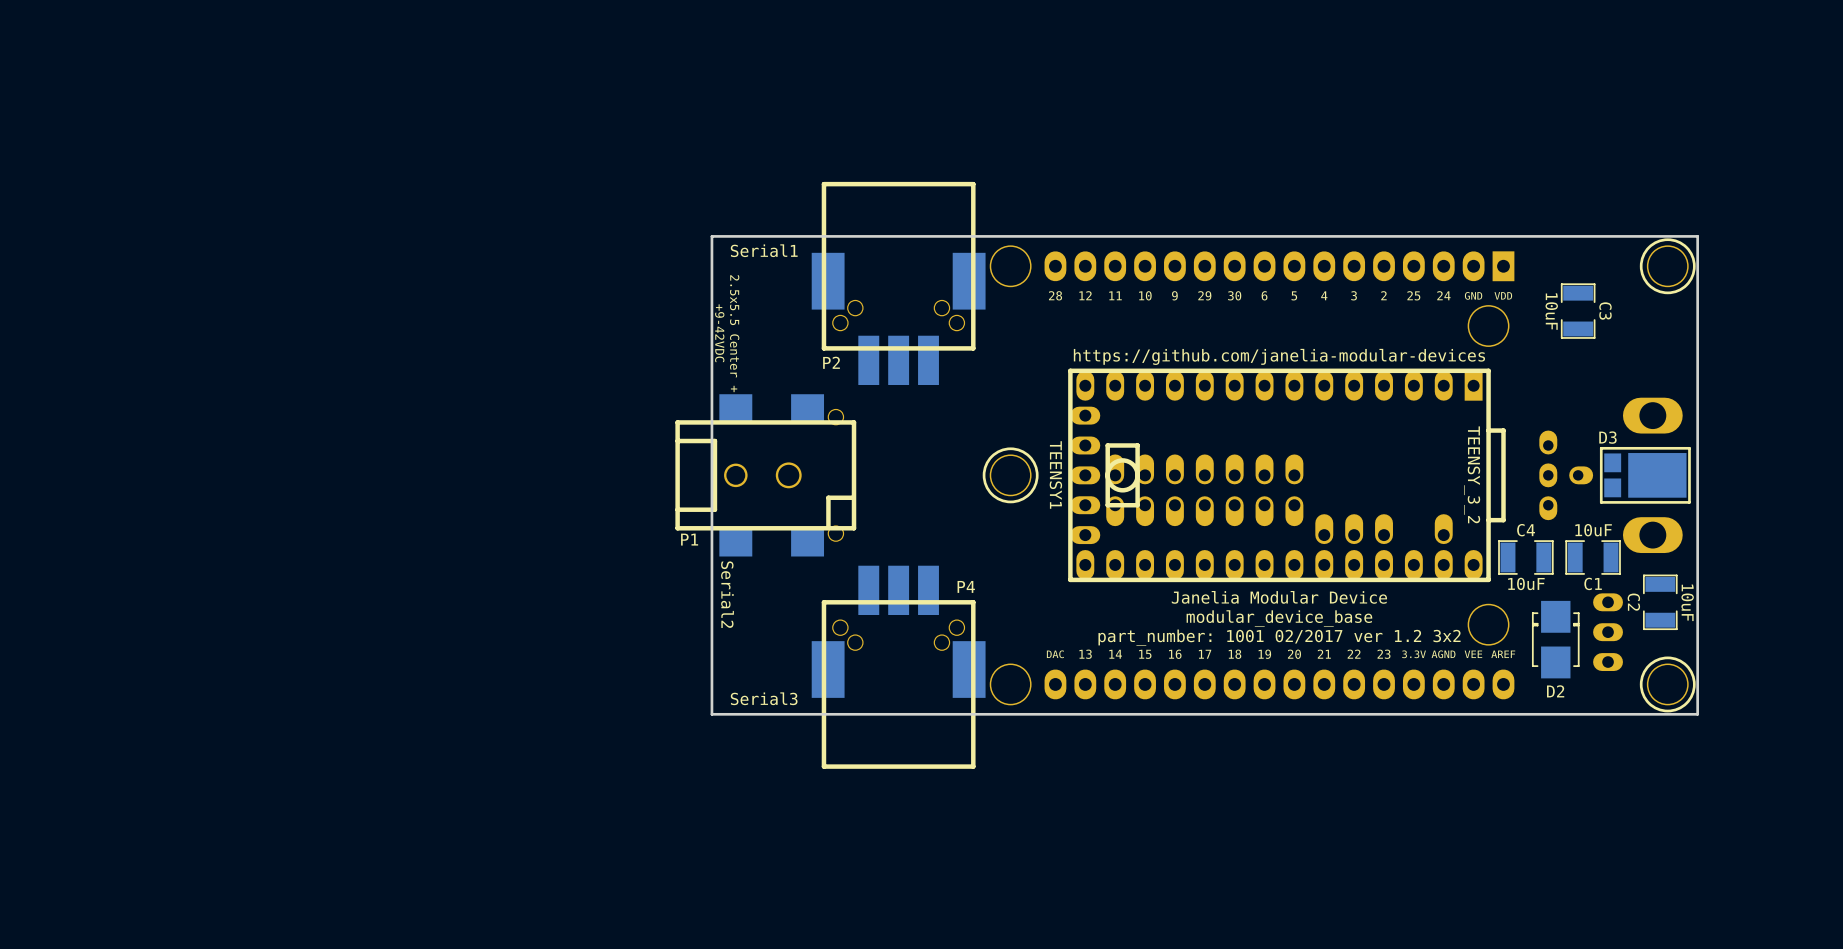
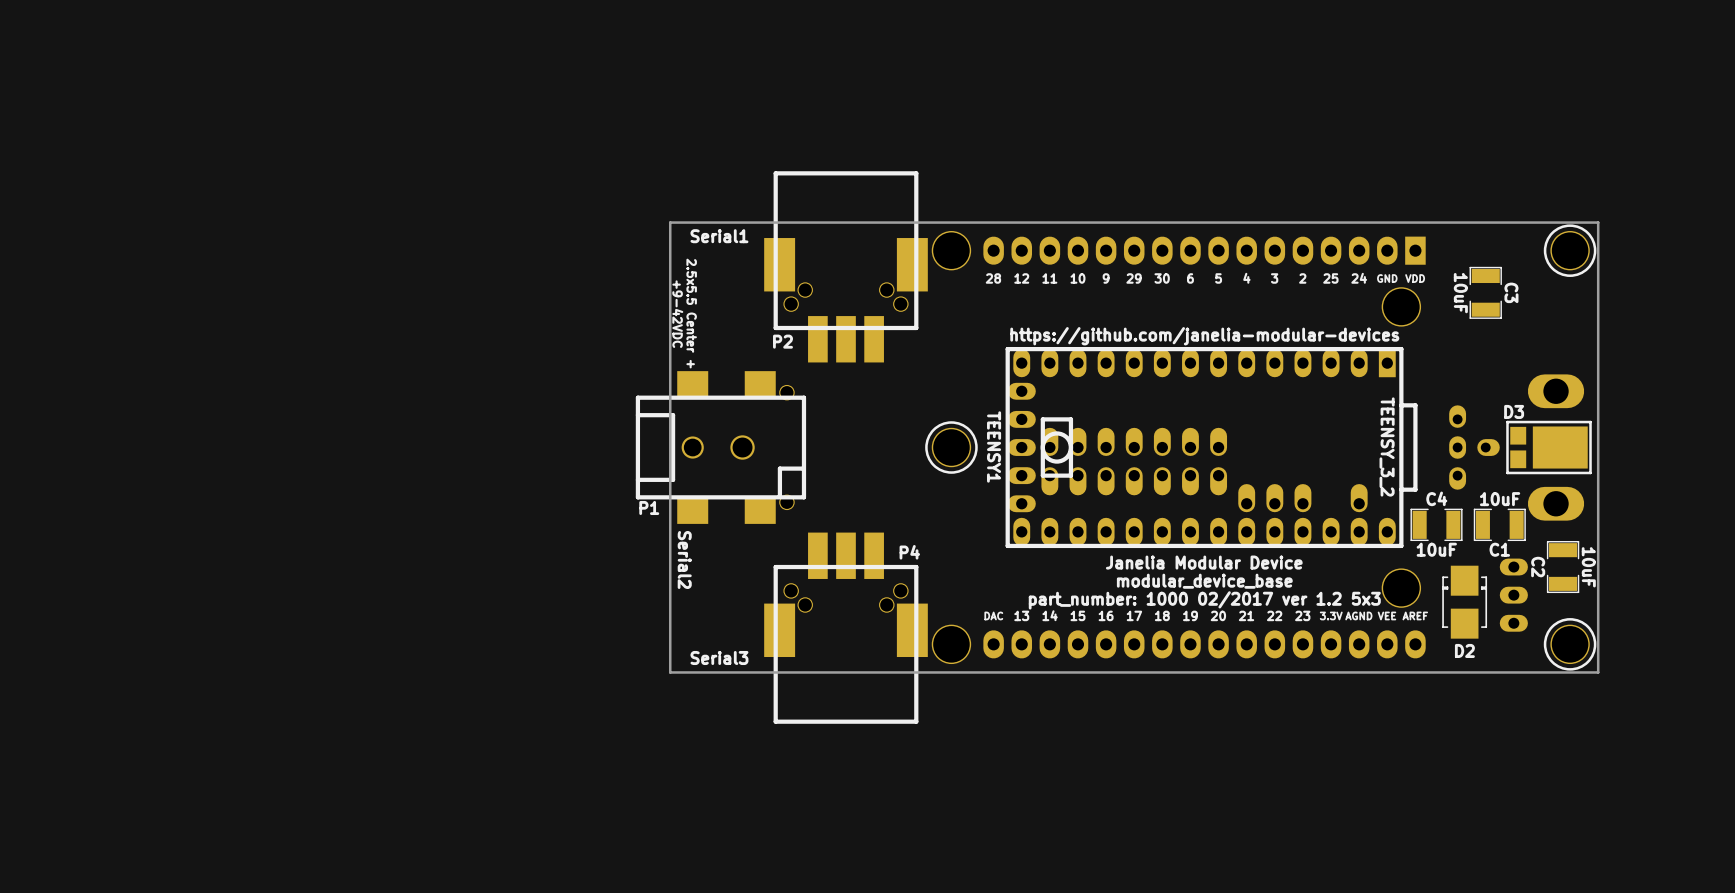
text: part_number: 1001 02/2017 ver 1.2 3x2 (1279, 637) -> part_number: 1000 02/2017 ver 1.2 5x3 (1204, 600)

